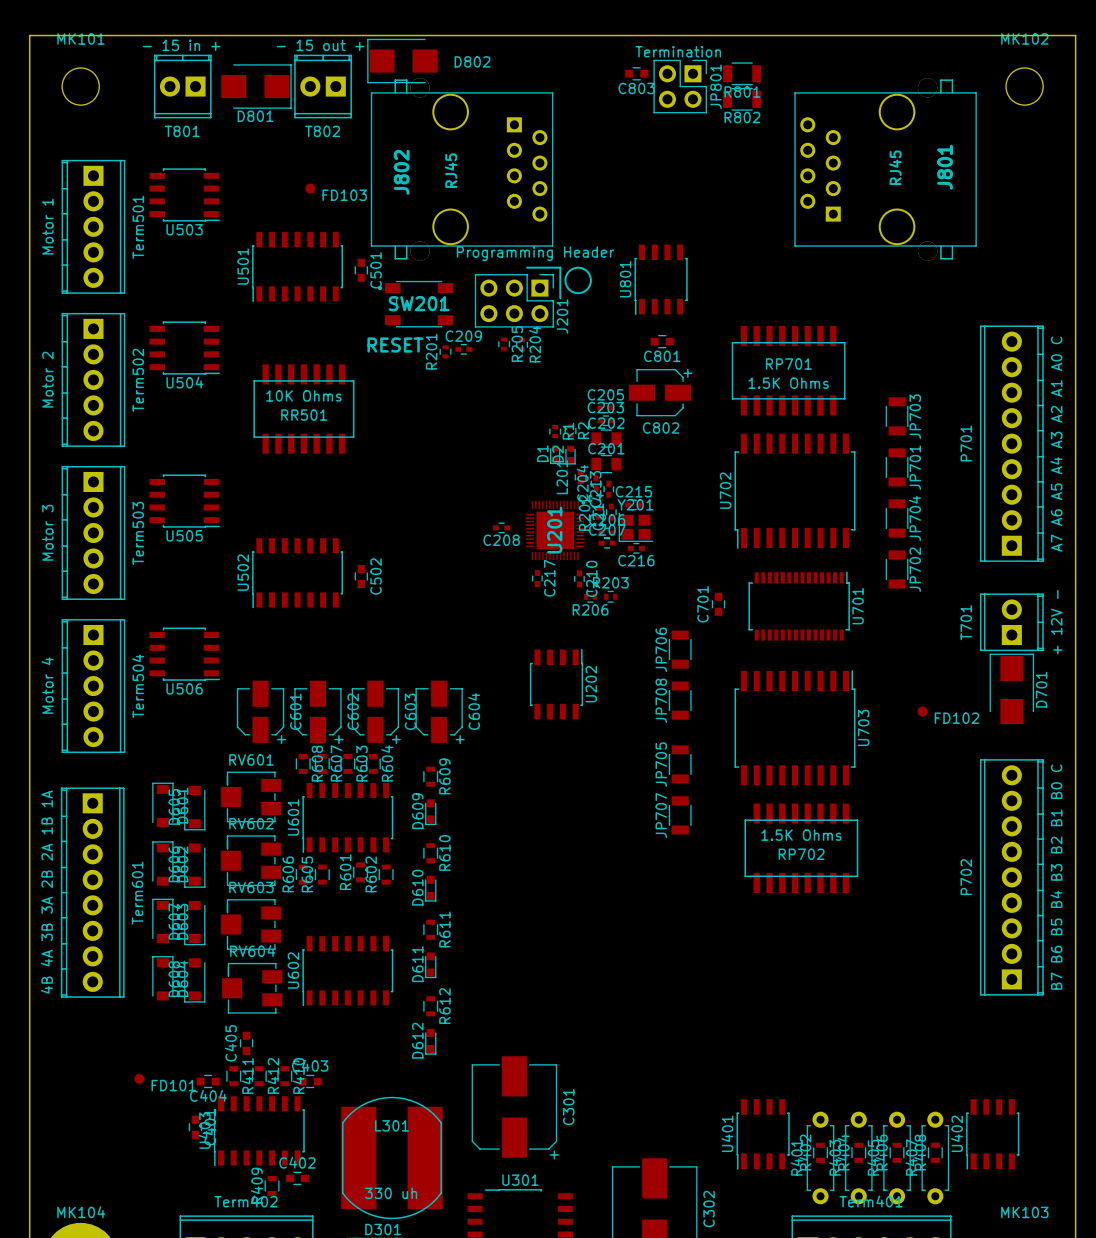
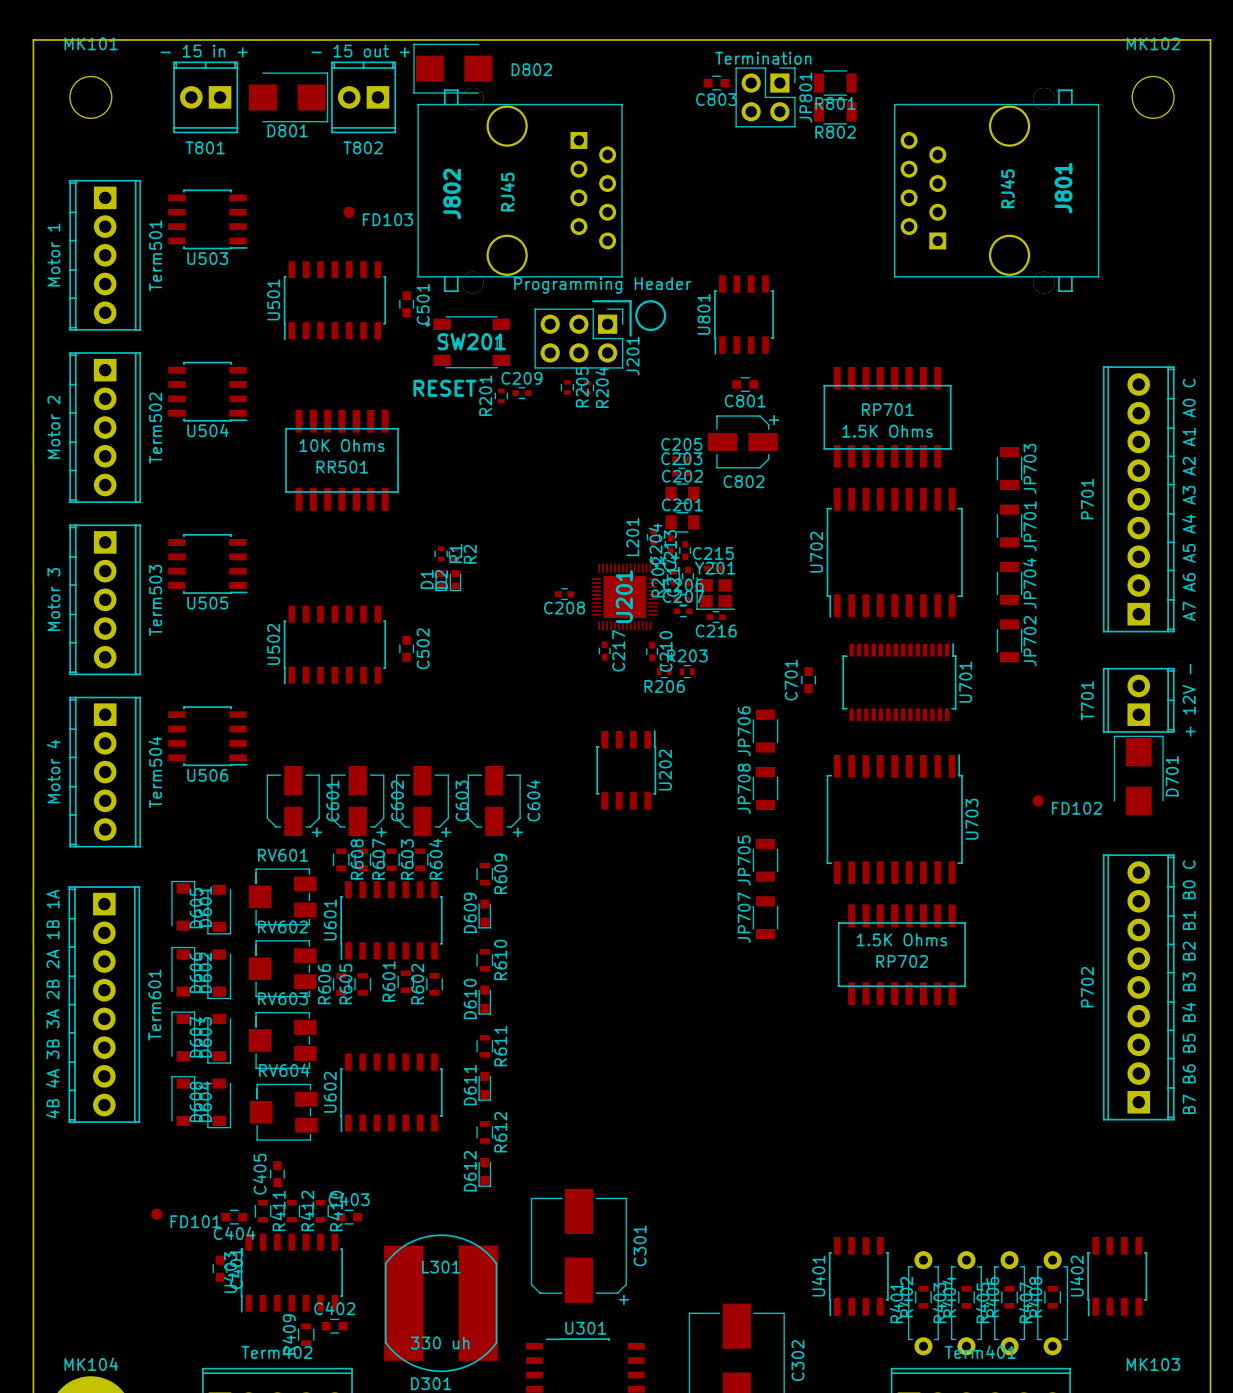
R2 position: (570, 430) -> (455, 554)
R1 position: (555, 431) -> (441, 553)
D1 position: (555, 454) -> (441, 580)
D2 position: (570, 455) -> (455, 580)

